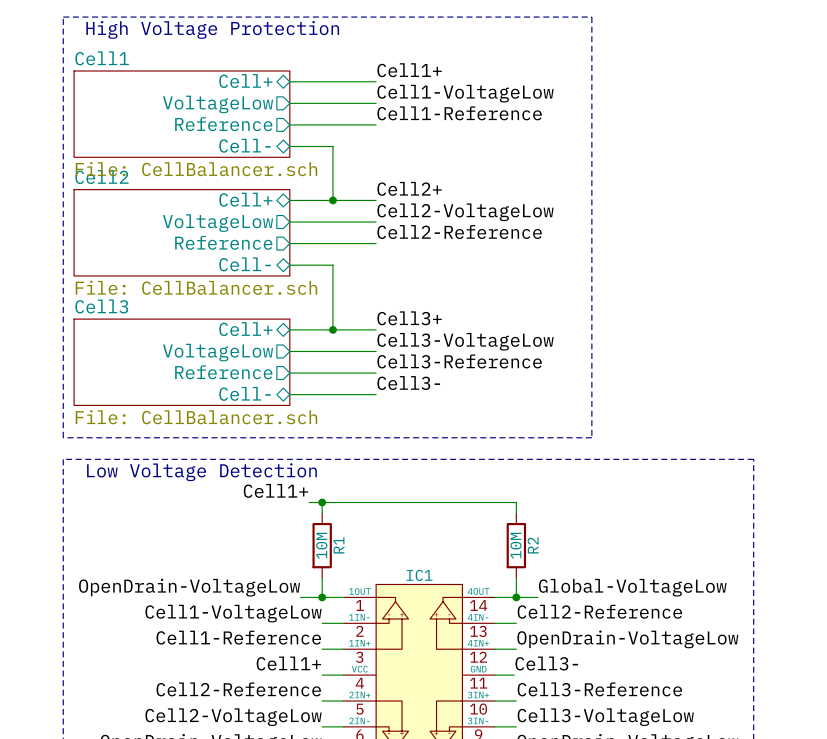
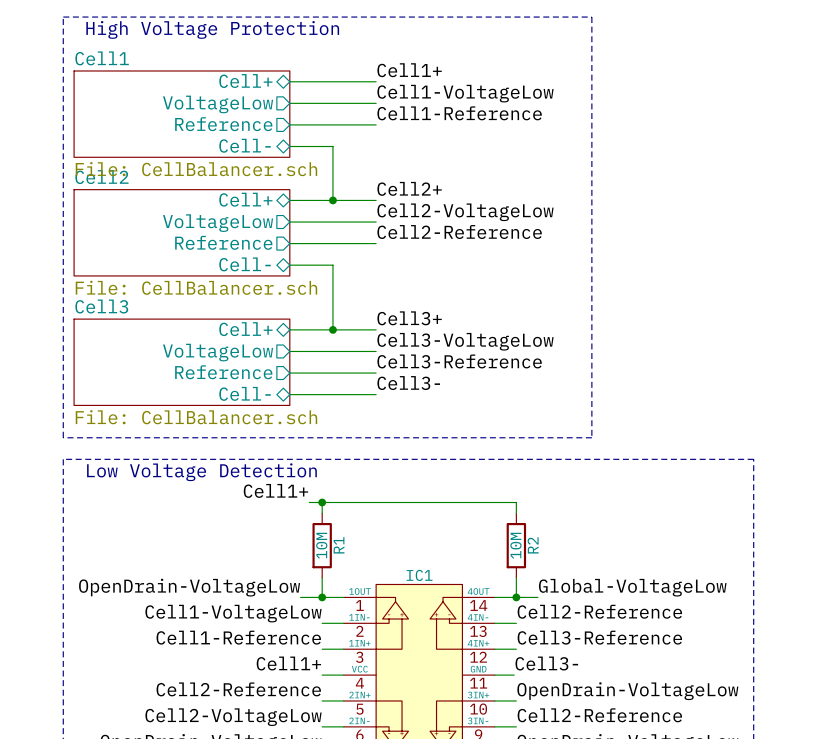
label: OpenDrain-VoltageLow (627, 639) -> Cell3-Reference (599, 637)
label: Cell3-Reference (599, 689) -> OpenDrain-VoltageLow (627, 691)
label: Cell3-VoltageLow (605, 717) -> Cell2-Reference (599, 715)

